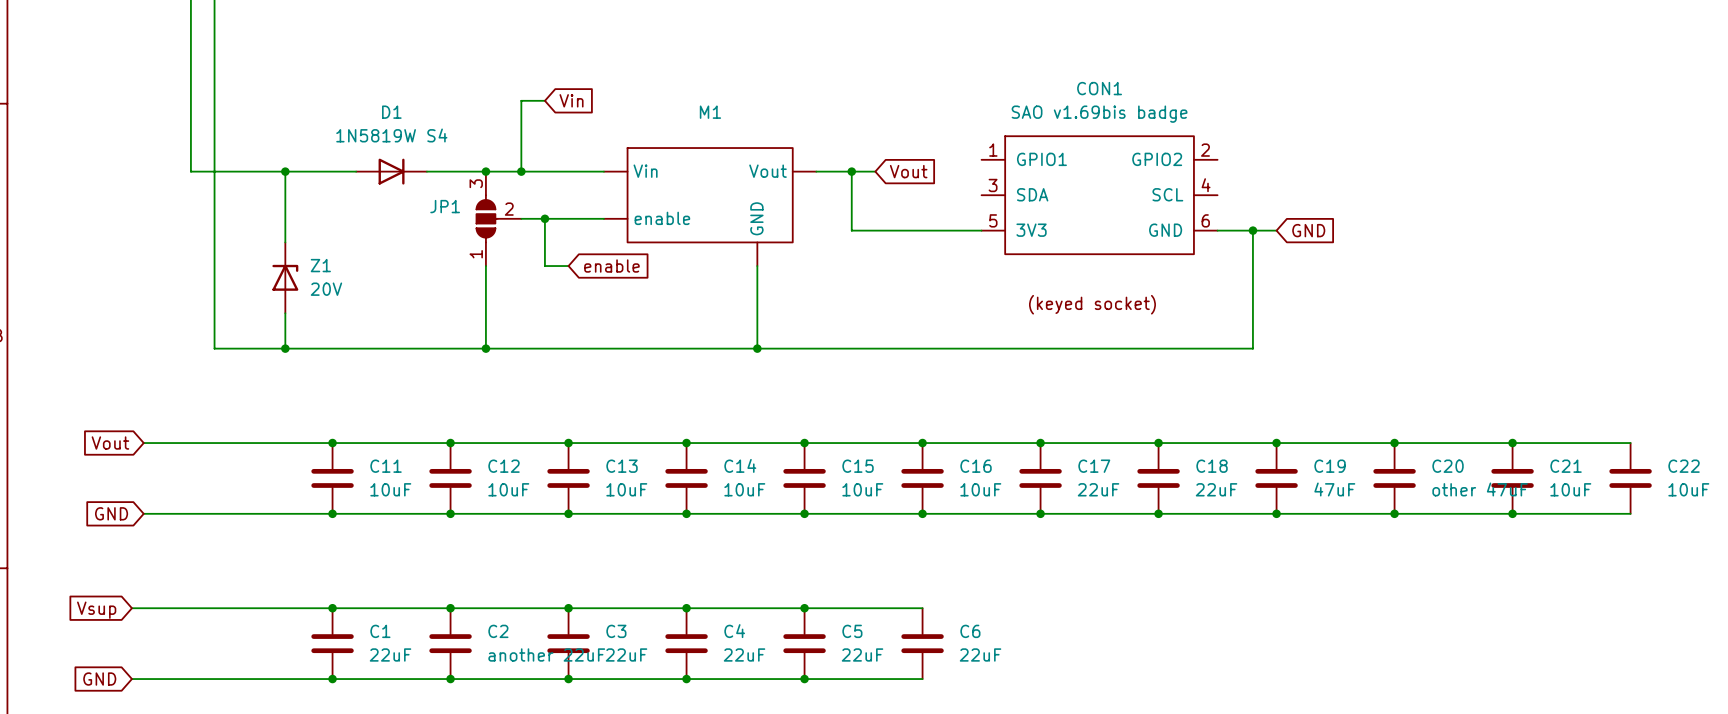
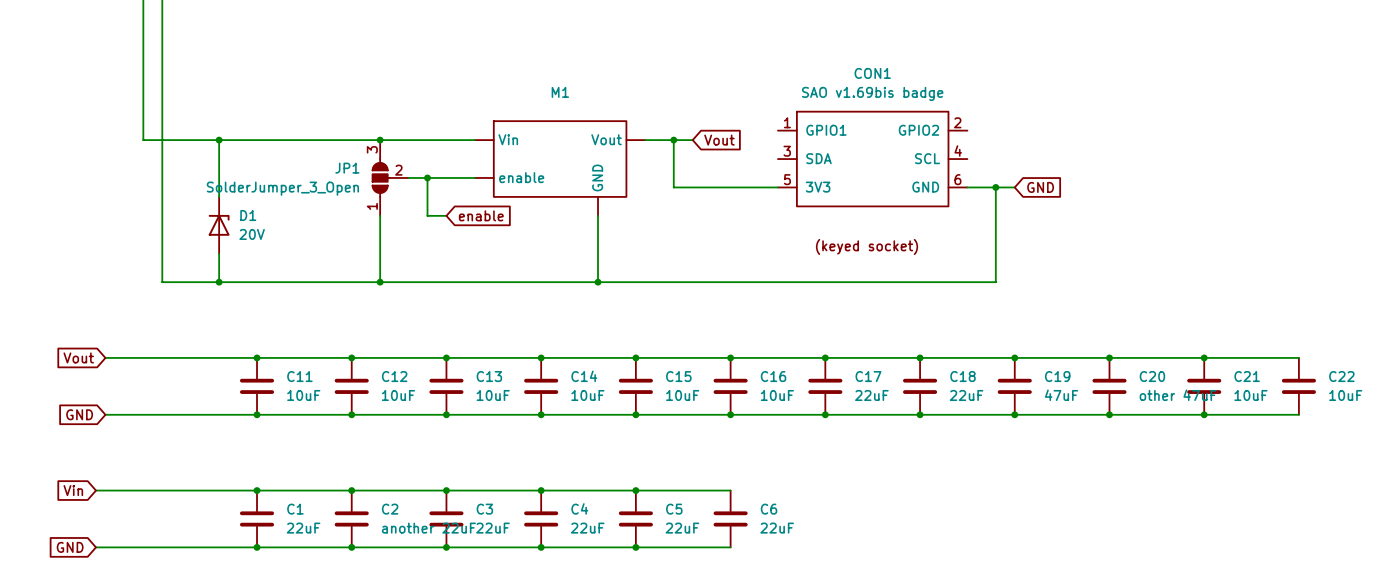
wire: (544, 100) (521, 100) (521, 171) -> none
global label: Vin (571, 100) -> none
D1: 1N5819W S4 (391, 171) -> none
junction: (521, 171) -> none
JP1 value: none -> SolderJumper_3_Open (282, 188)
Z1 name: Z1 (320, 265) -> D1 (248, 215)
global label: Vsup (96, 610) -> Vin (73, 490)

